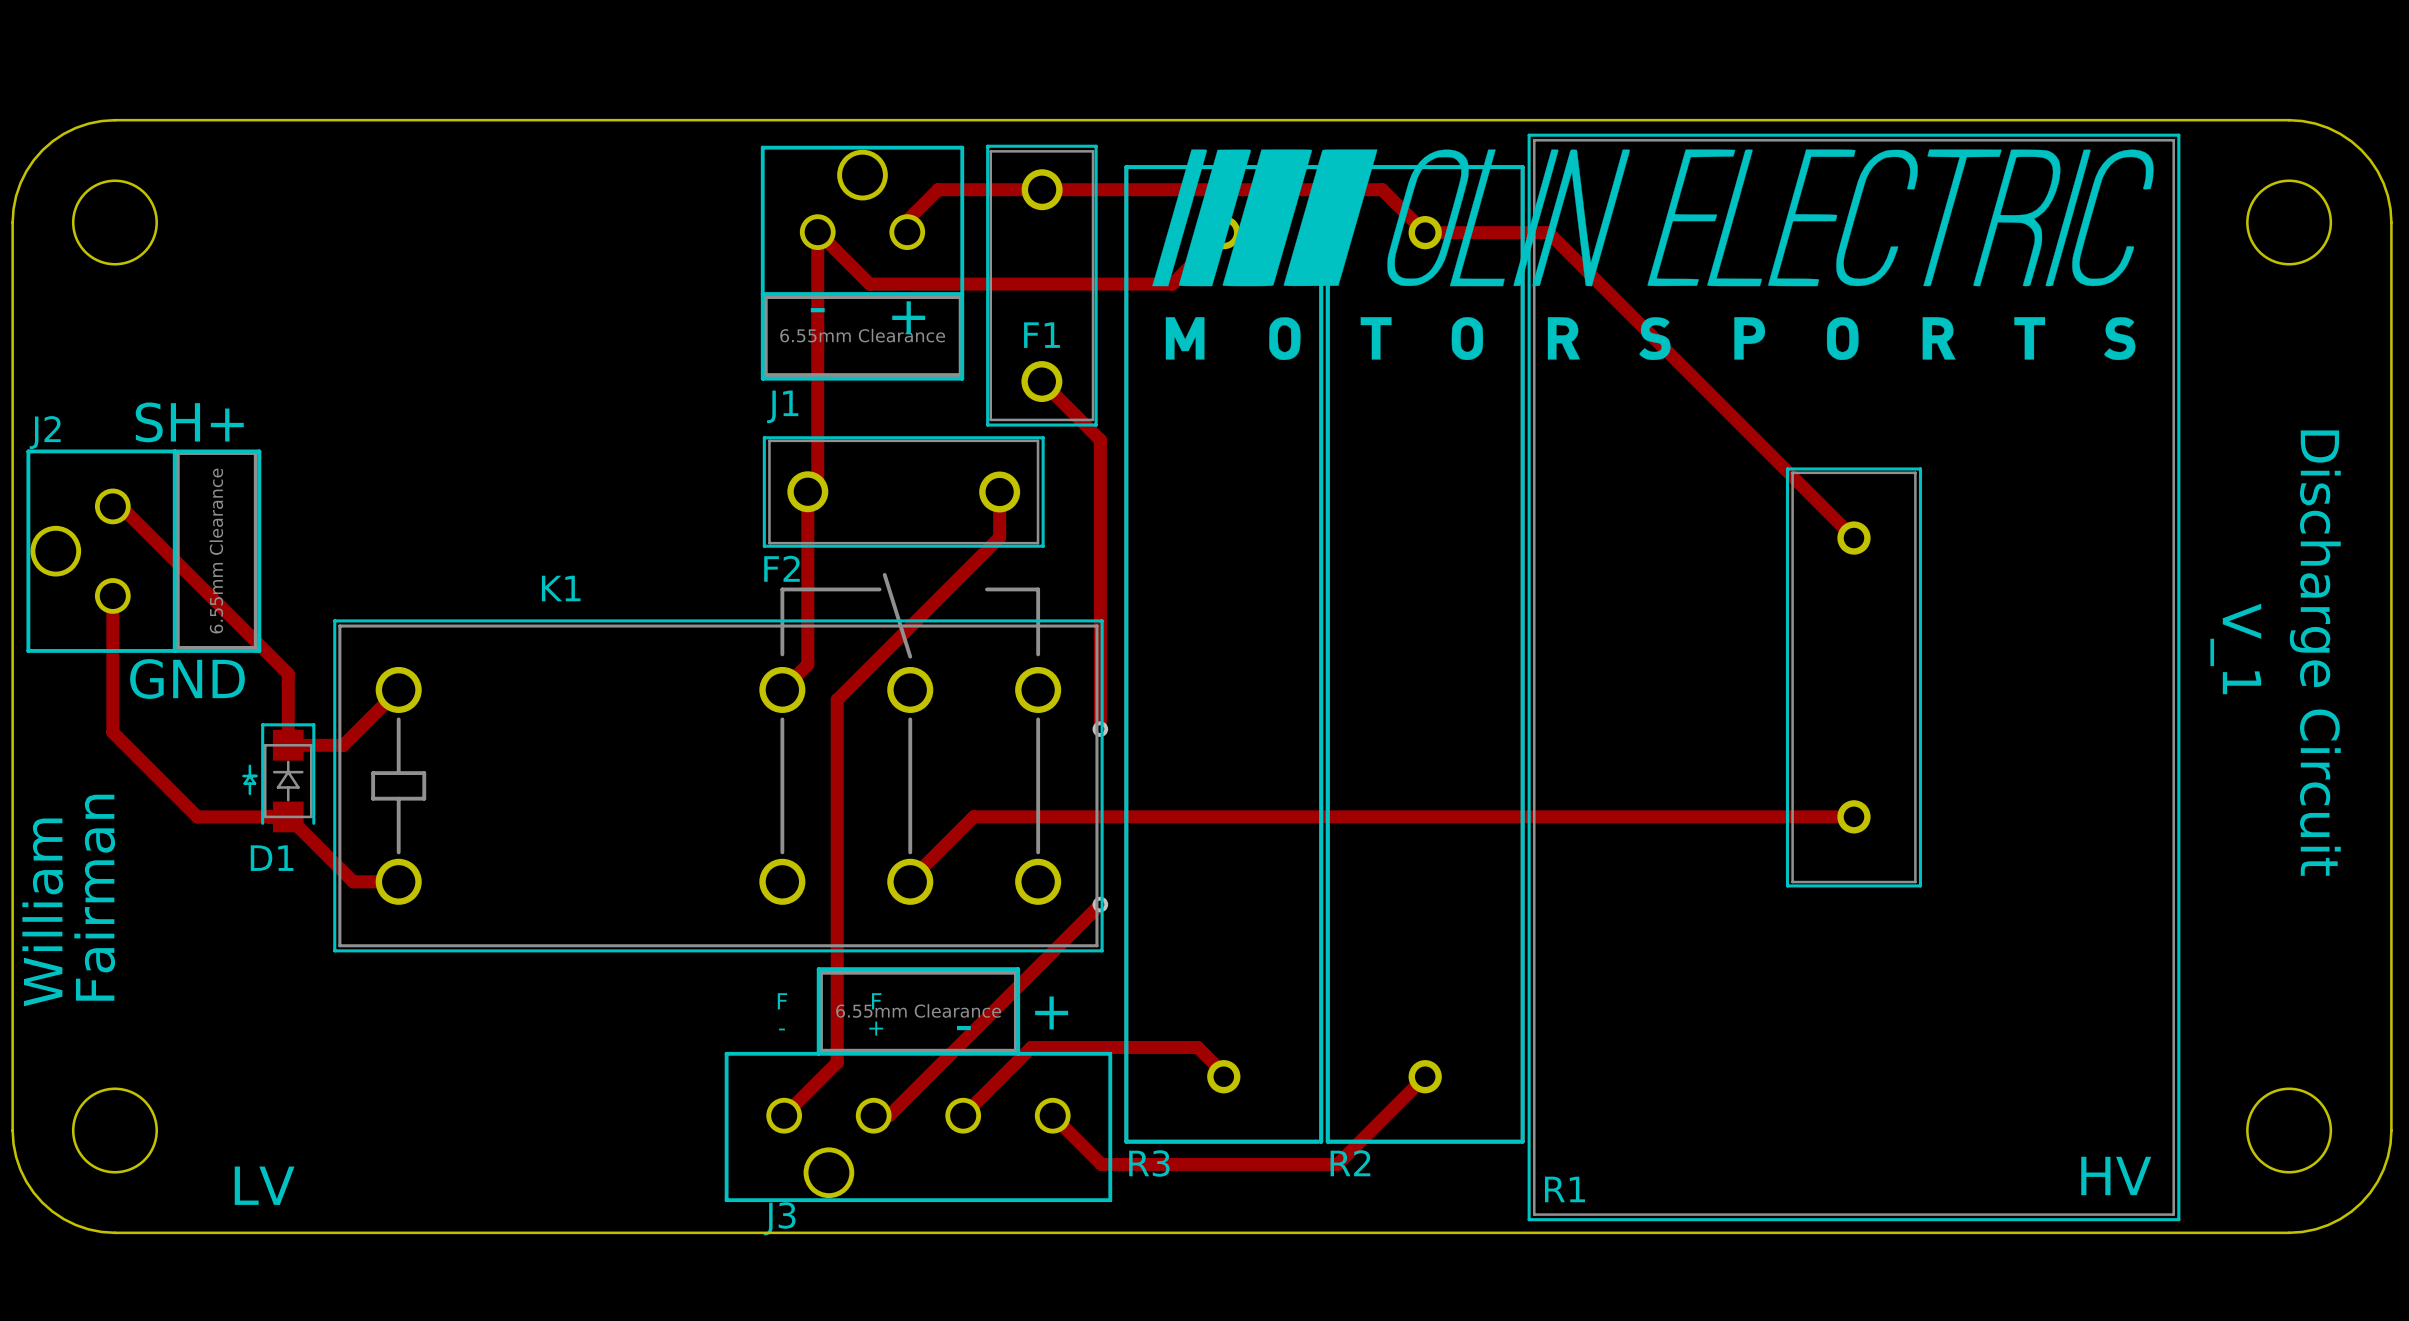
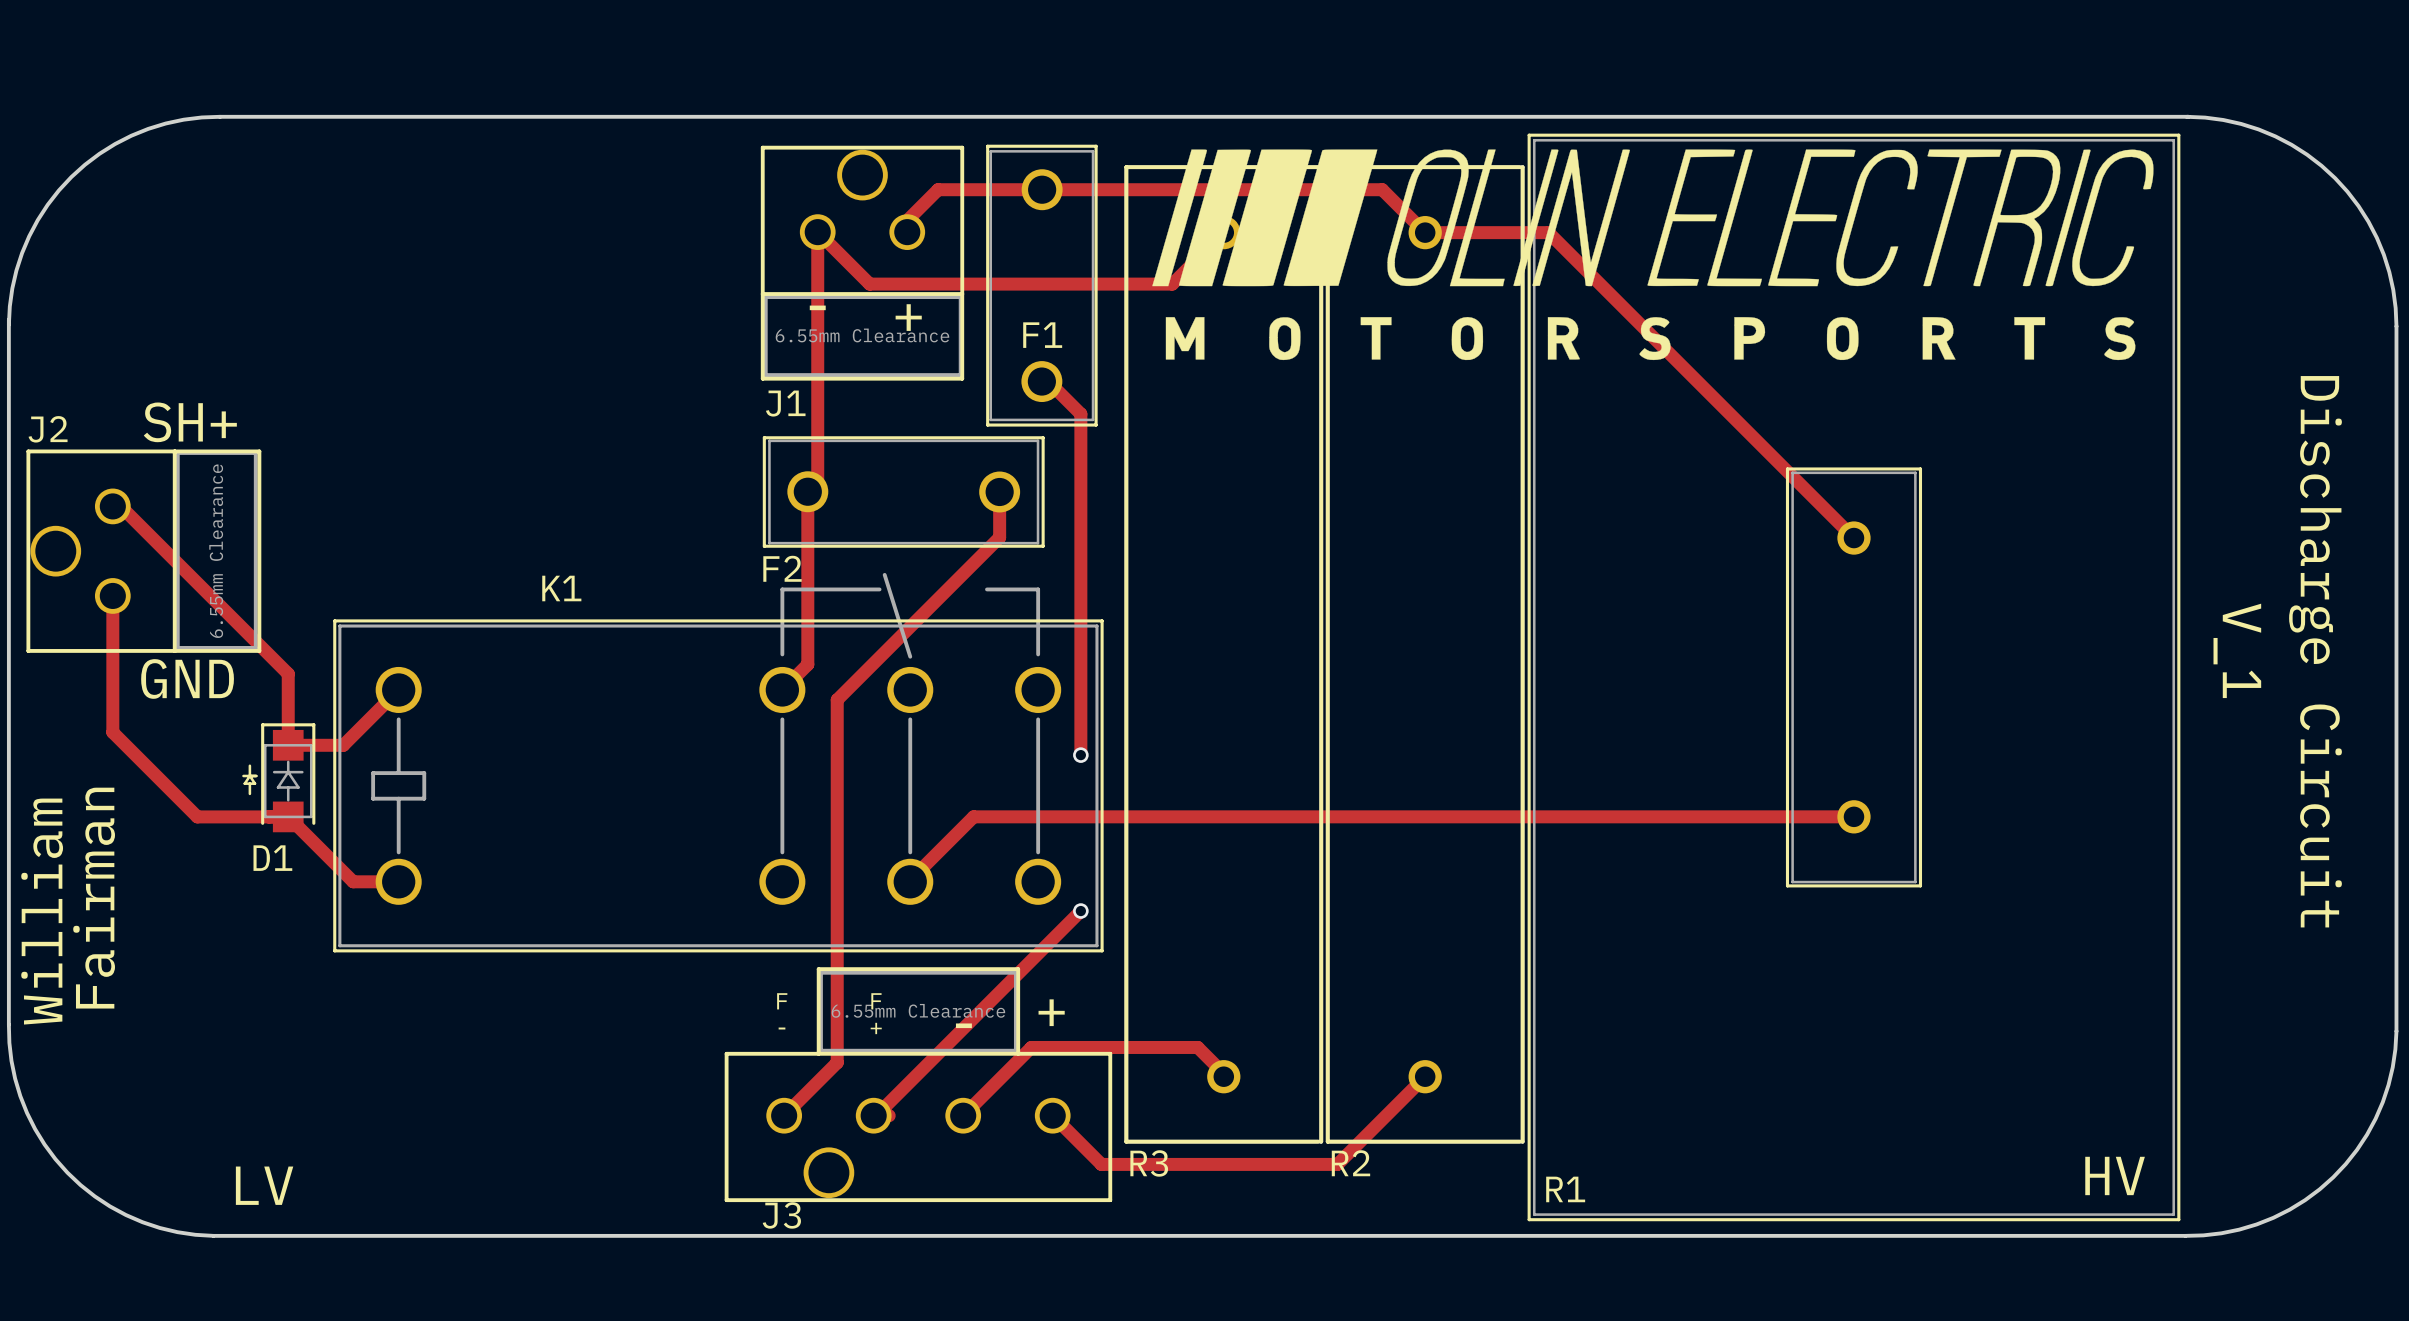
board edge: none -> (2186, 116) (2223, 119) (2258, 129) (2291, 144) (2321, 165) (2335, 178) (2358, 206) (2368, 221) (2383, 254) (2393, 289) (2396, 326) (2396, 1031) (2392, 1067) (2382, 1102) (2366, 1134) (2345, 1164) (2333, 1177) (2305, 1200) (2273, 1217) (2239, 1229) (2203, 1235) (213, 1235) (177, 1232) (142, 1222) (125, 1215) (94, 1196) (80, 1185) (55, 1159) (44, 1144) (26, 1112) (20, 1096) (11, 1060) (8, 1024) (8, 319)
board edge: none -> (2188, 116) (201, 117) (183, 119) (148, 128) (115, 144) (84, 164) (58, 190) (37, 220) (22, 253) (12, 288) (8, 324)
board edge: (114, 120) (2289, 120) (2315, 123) (2328, 127) (2351, 141) (2370, 160) (2377, 171) (2387, 196) (2391, 222) (2391, 1130) (2387, 1157) (2383, 1169) (2370, 1192) (2351, 1211) (2328, 1225) (2315, 1229) (2289, 1232) (114, 1232) (88, 1229) (75, 1225) (52, 1211) (33, 1192) (20, 1169) (16, 1157) (12, 1130) (12, 222) (16, 196) (20, 183) (33, 160) (42, 150) (52, 141) (75, 127) (88, 123) (114, 120) -> none
round board edge: [71, 179, 158, 266] -> none
round board edge: [2246, 179, 2333, 266] -> none
track: (1041, 381) (1100, 440) (1100, 729) -> (1041, 381) (1048, 381) (1080, 414) (1080, 755)
via: (1100, 729) -> none
via: none -> (1080, 755)
track: (1100, 904) (889, 1115) -> none
via: (1100, 904) -> none
track: none -> (1080, 911) (876, 1115)
via: none -> (1080, 911)
round board edge: [71, 1087, 158, 1174] -> none
round board edge: [2246, 1087, 2333, 1174] -> none

